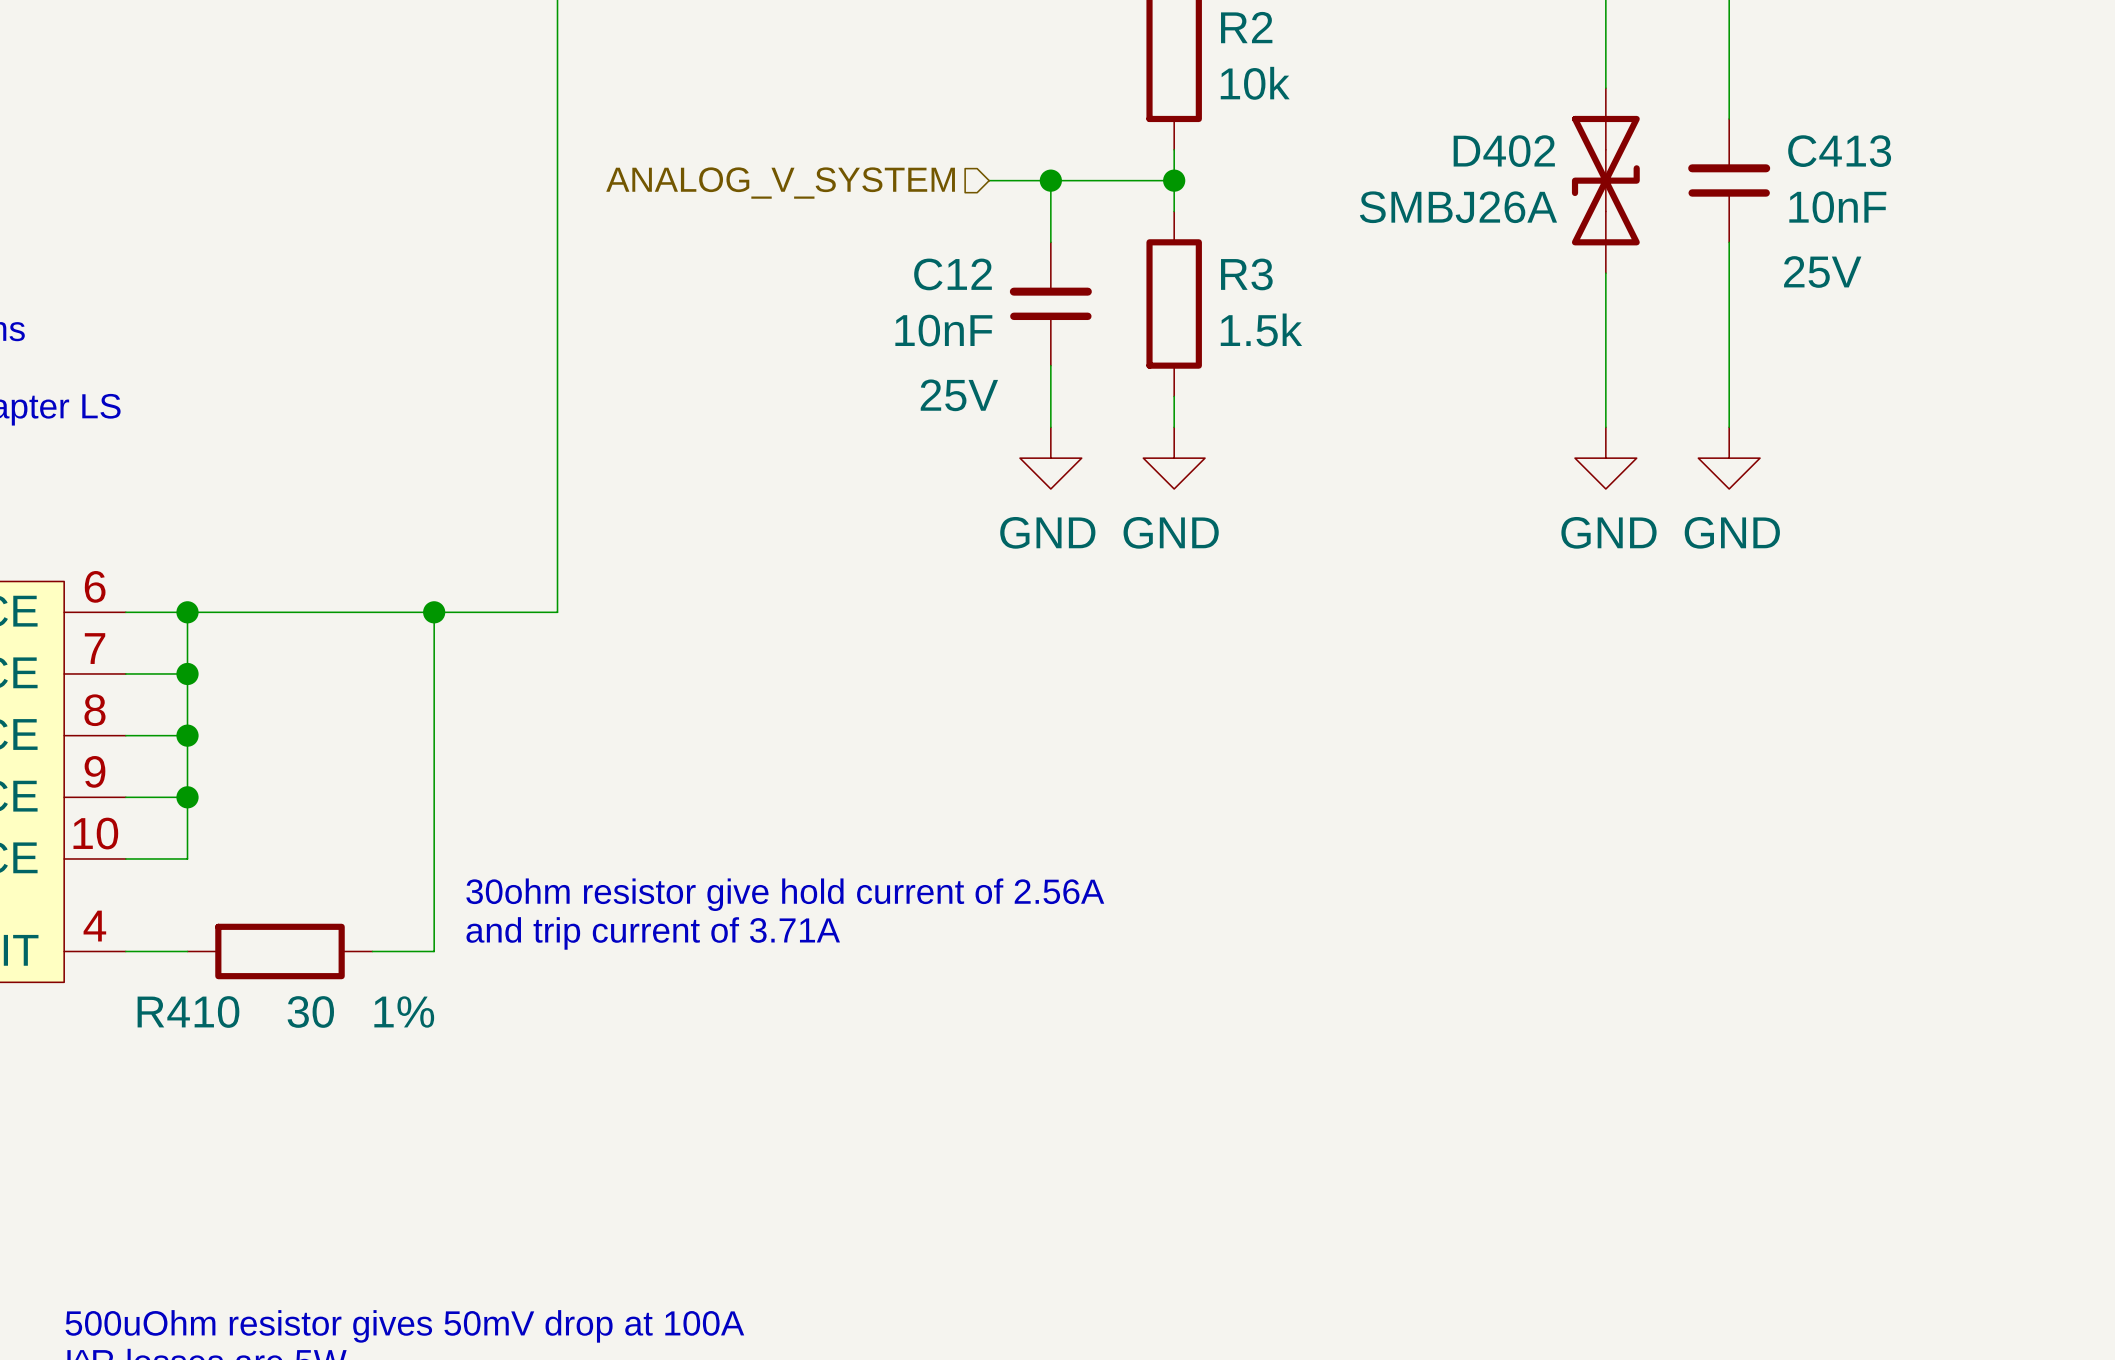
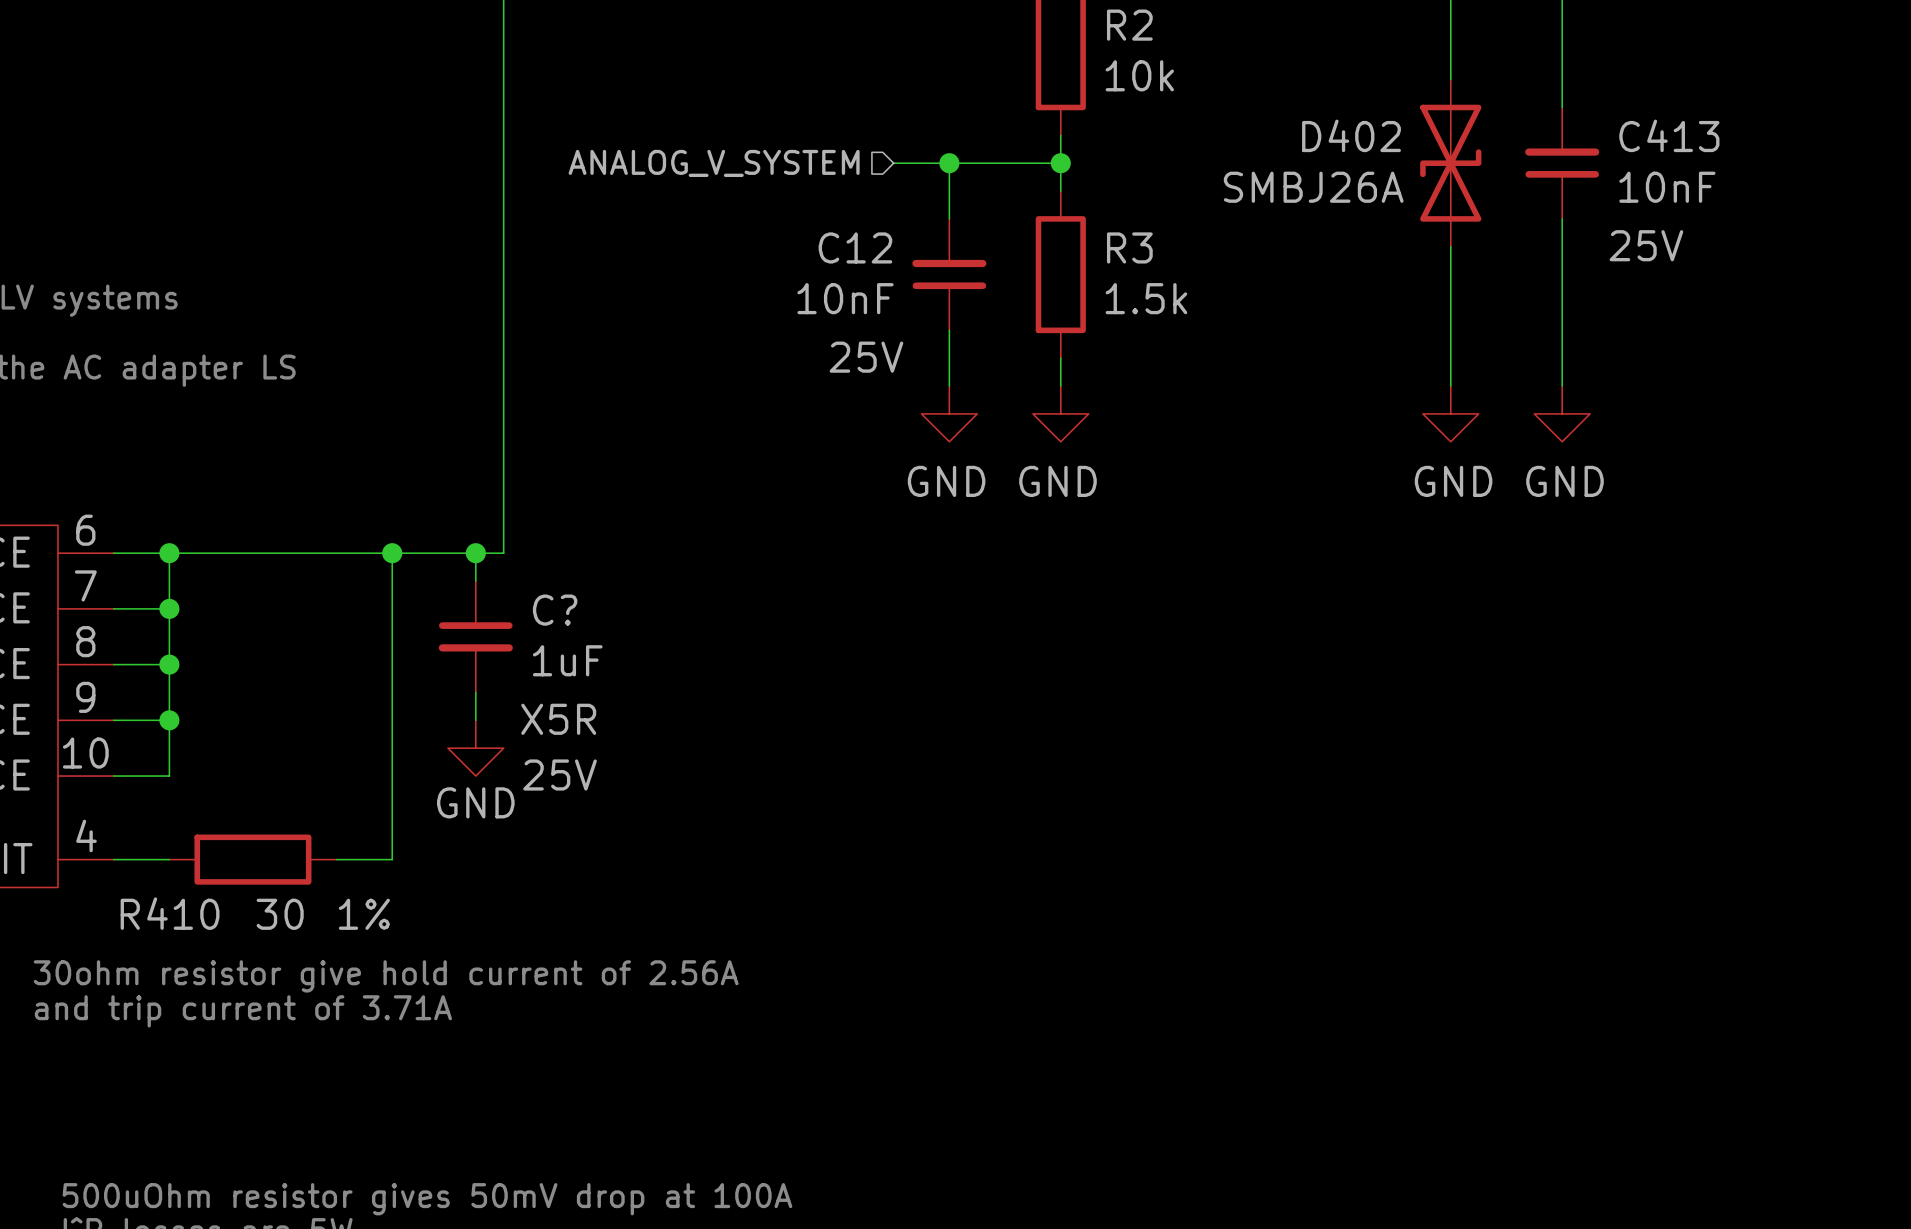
wire: none -> (475, 553) (475, 581)
junction: none -> (475, 553)
C?: none -> 1uF (475, 636)
wire: none -> (475, 692) (475, 720)
power symbol: none -> GND (475, 748)
text position: 30ohm resistor give hold current of 2.56A (785, 894) -> 30ohm resistor give hold current of 2.56A (386, 976)
text position: and trip current of 3.71A (653, 933) -> and trip current of 3.71A (243, 1011)

